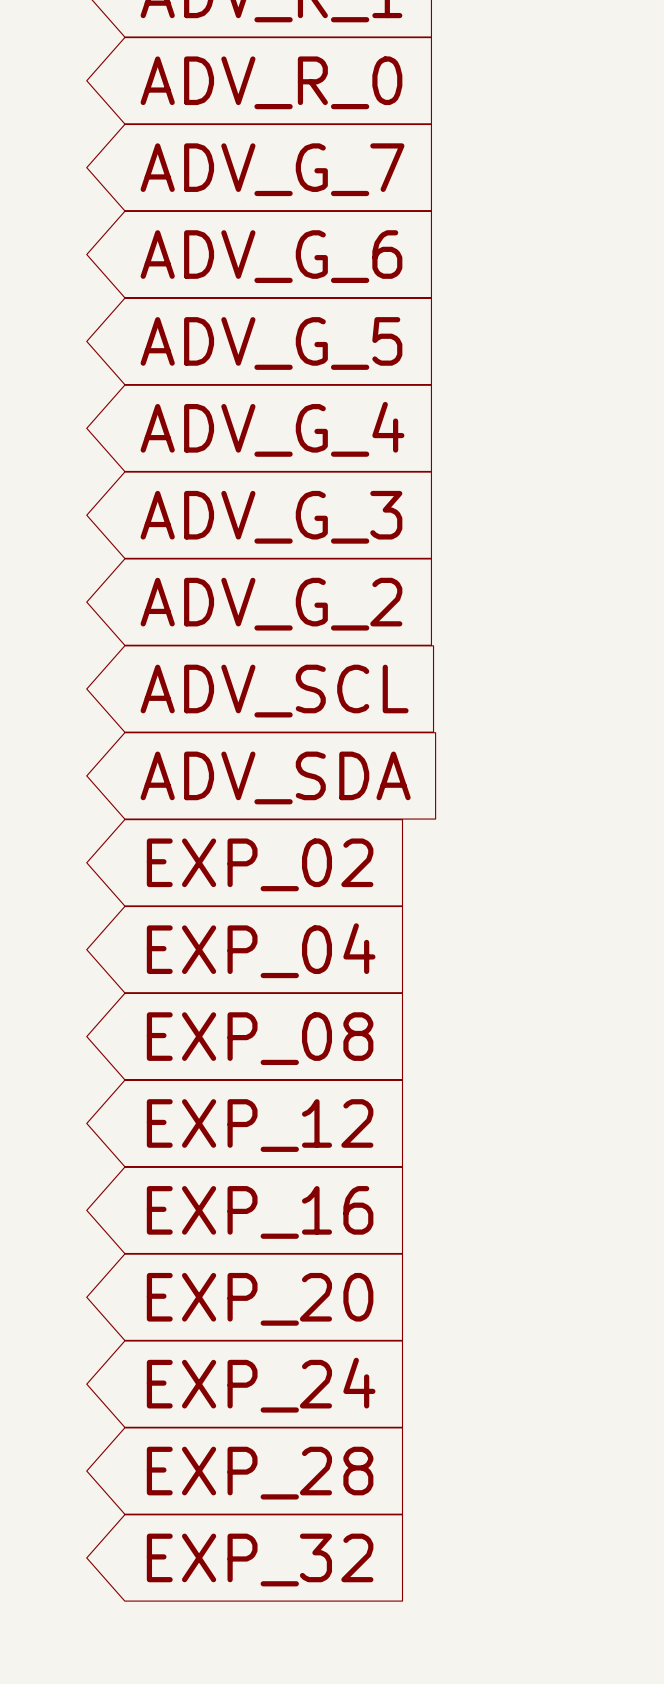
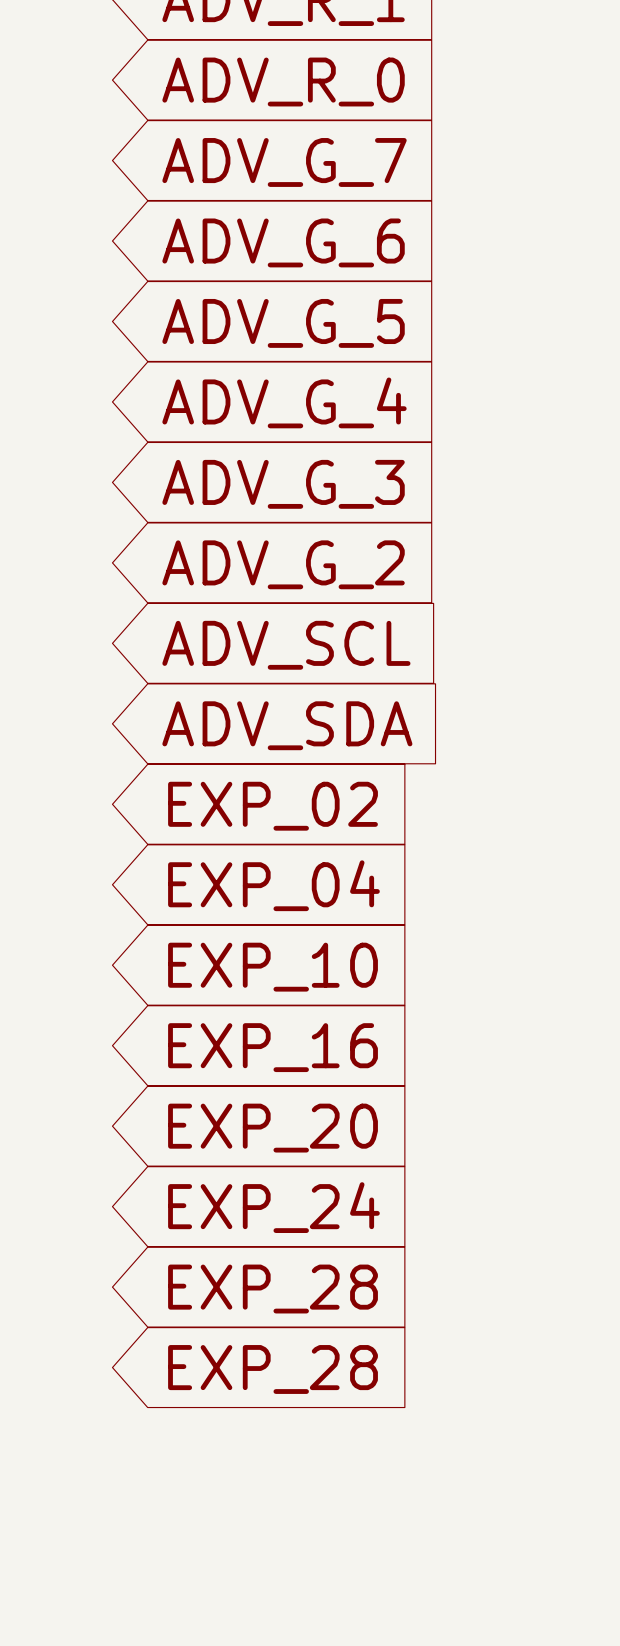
global label: EXP_08 (260, 1038) -> EXP_10 (273, 967)
global label: EXP_12 (260, 1125) -> EXP_16 (273, 1047)
global label: EXP_16 (260, 1212) -> EXP_20 (273, 1128)
global label: EXP_20 (260, 1299) -> EXP_24 (273, 1207)
global label: EXP_24 (261, 1385) -> EXP_28 (273, 1289)
global label: EXP_32 (260, 1560) -> none

